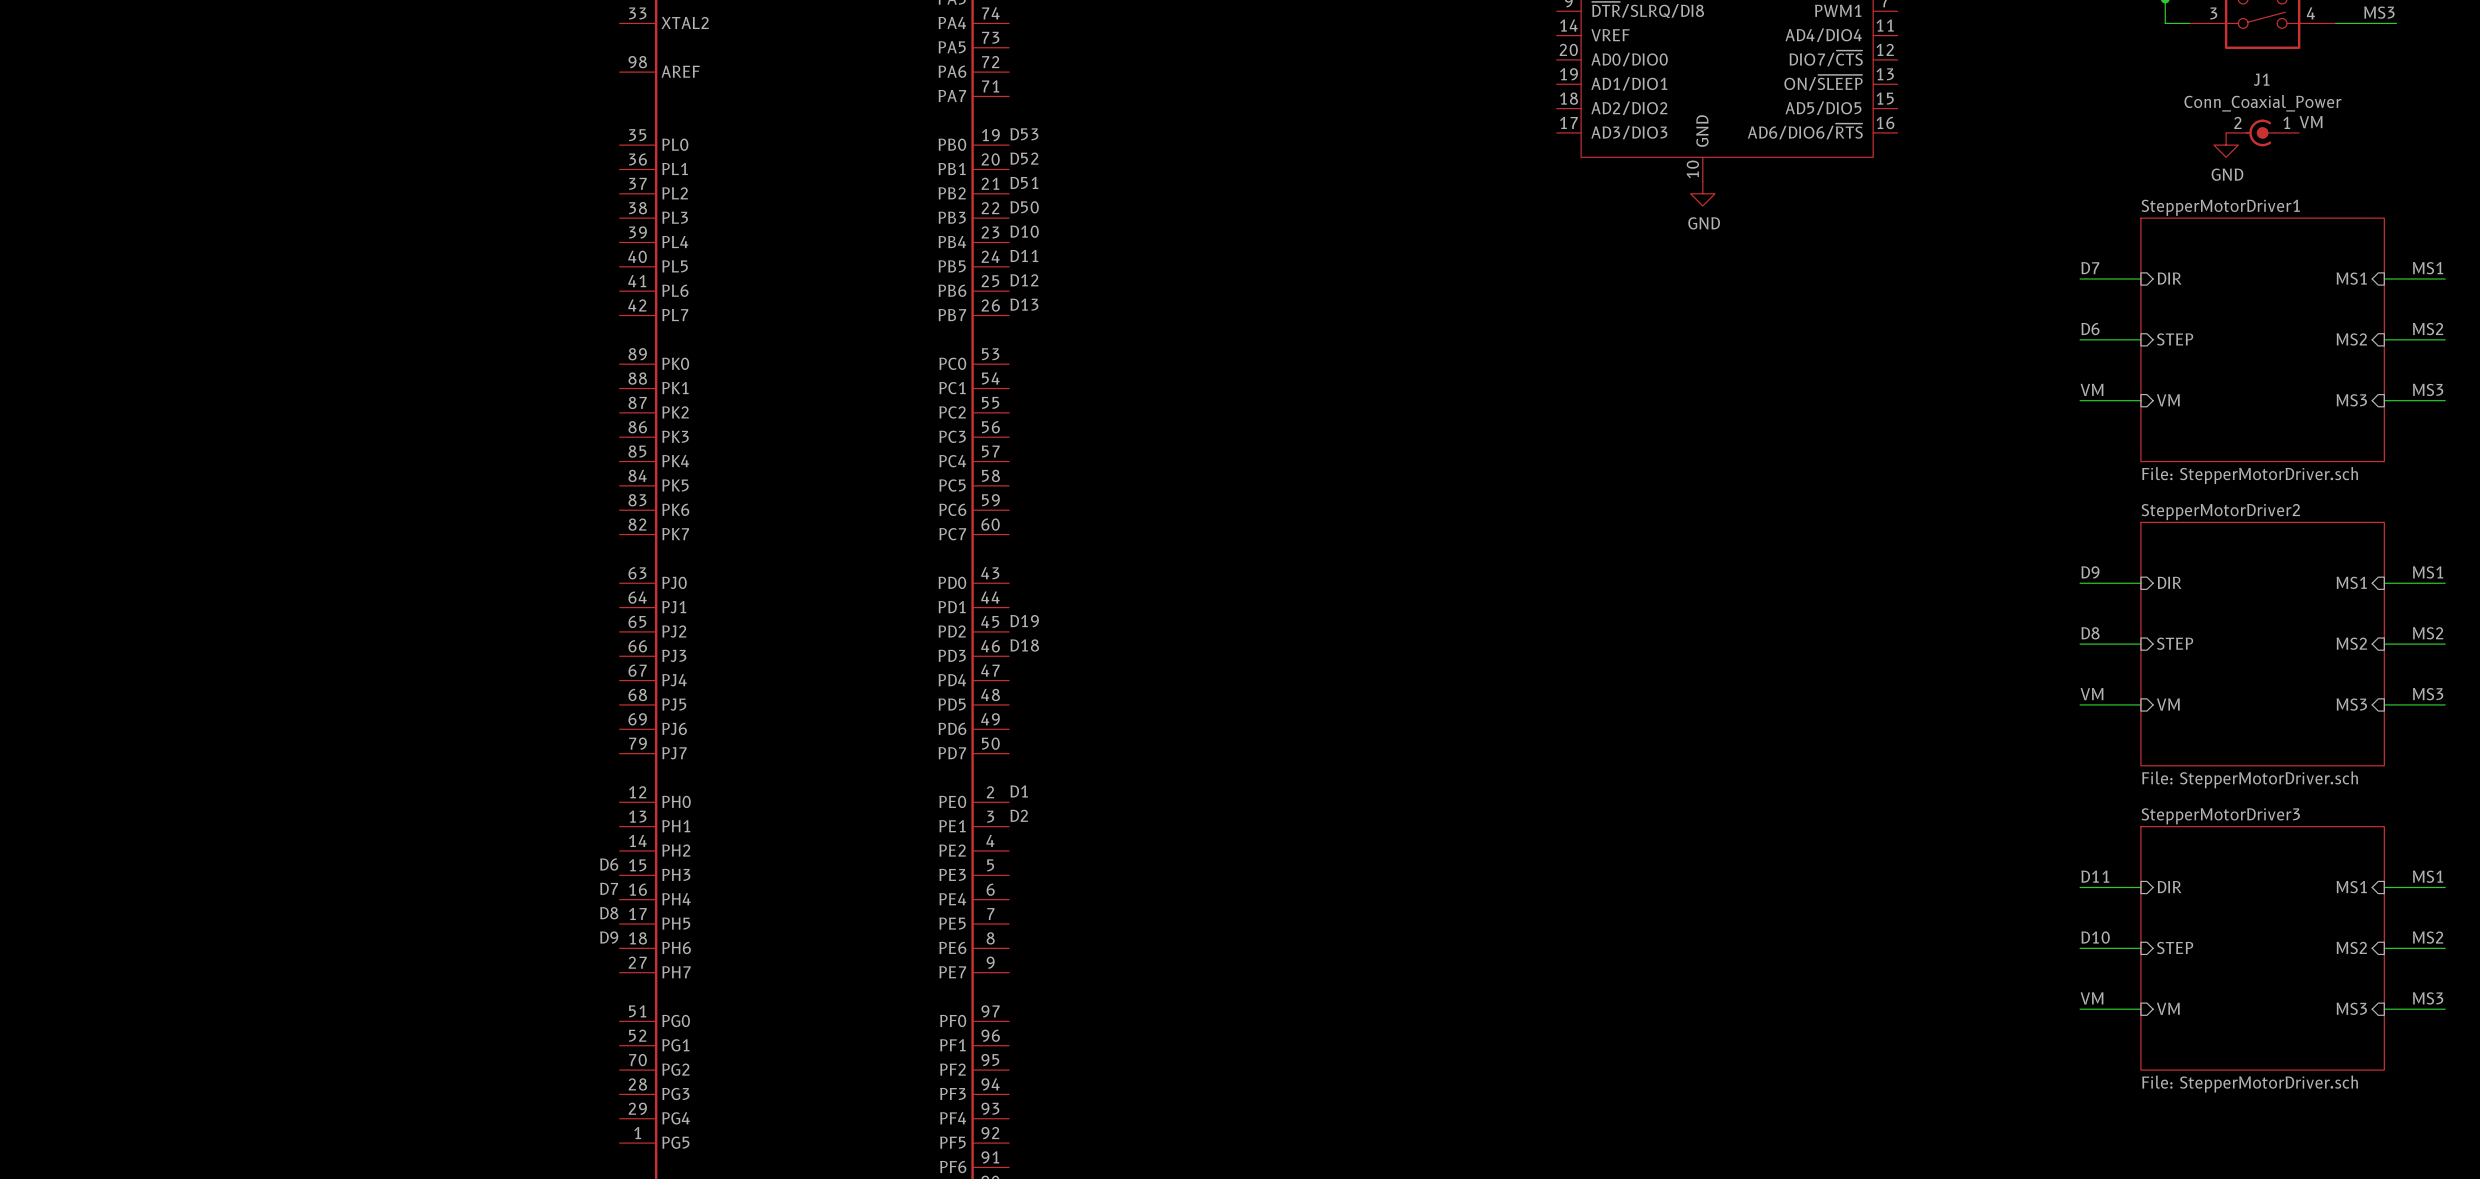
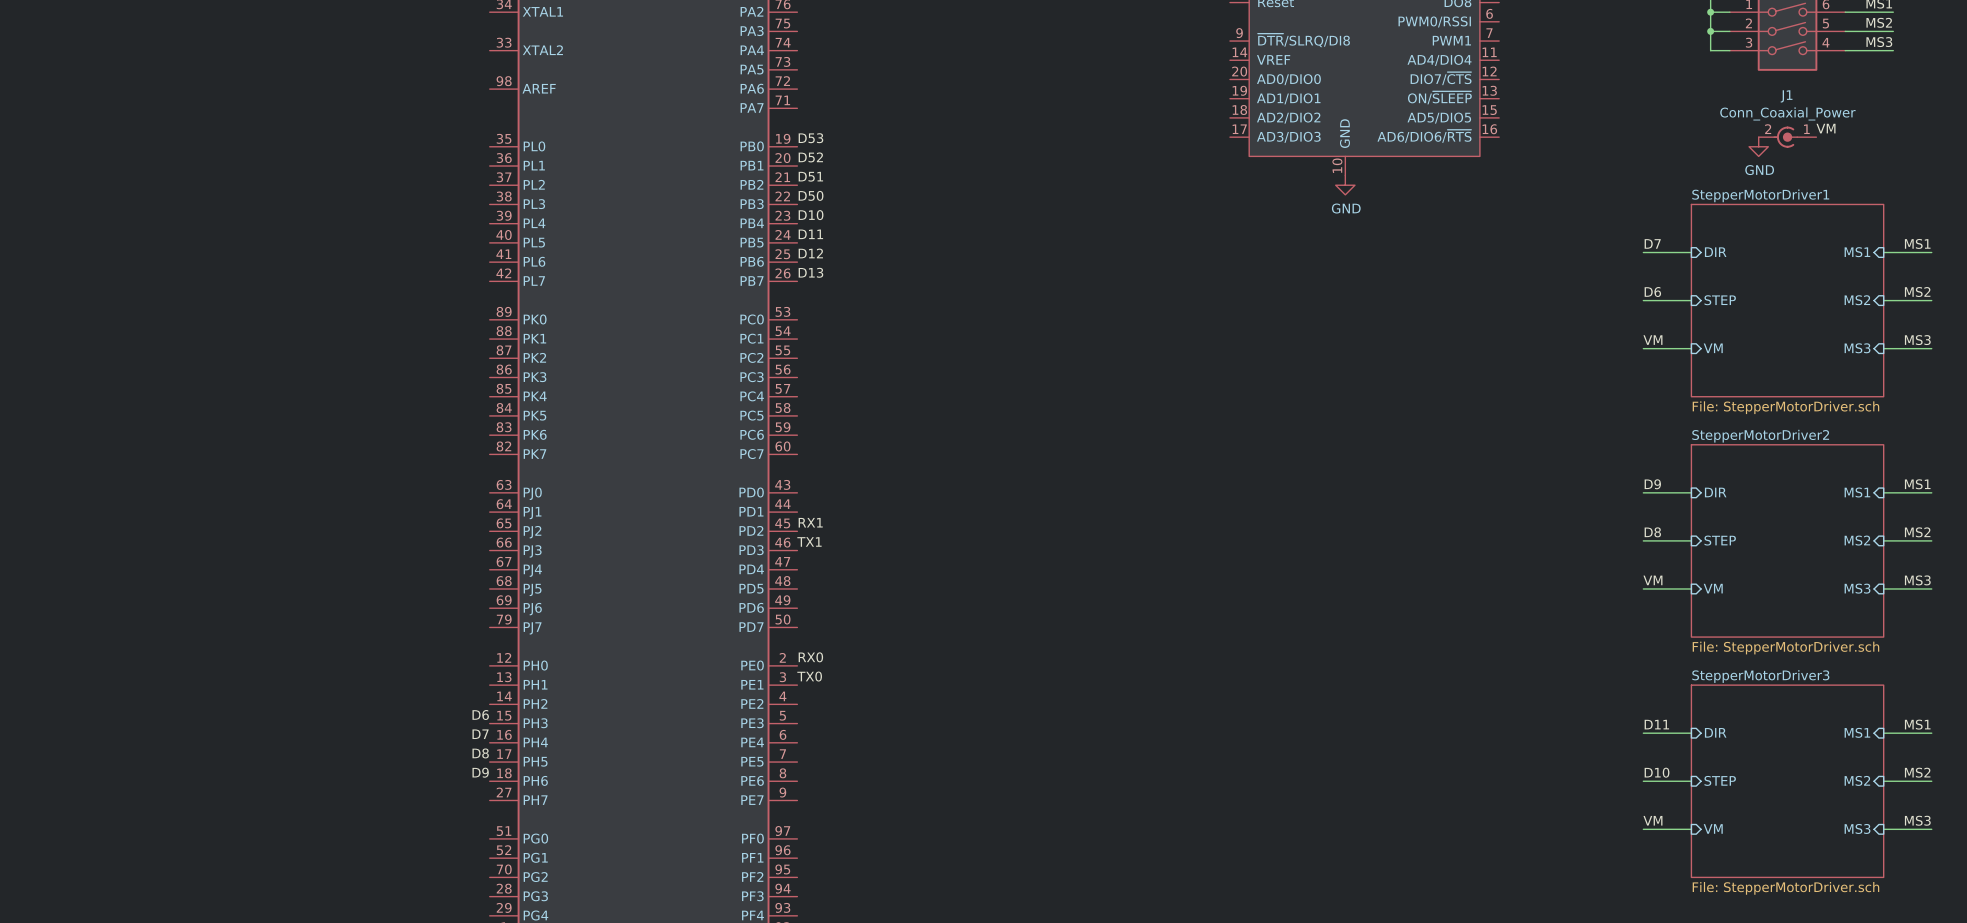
label: D19 (1024, 621) -> RX1 (810, 522)
label: D18 (1024, 645) -> TX1 (809, 541)
label: D1 (1019, 791) -> RX0 (810, 657)
label: D2 (1019, 815) -> TX0 (809, 676)

